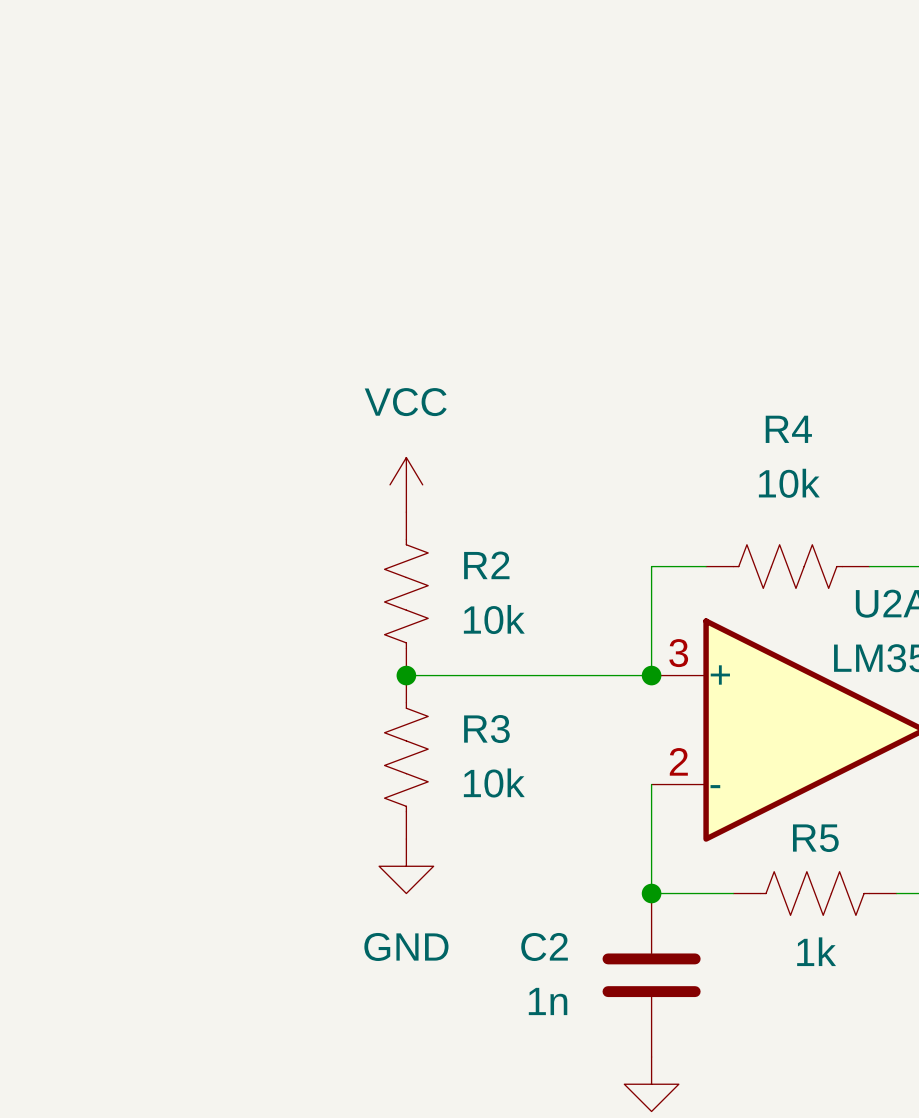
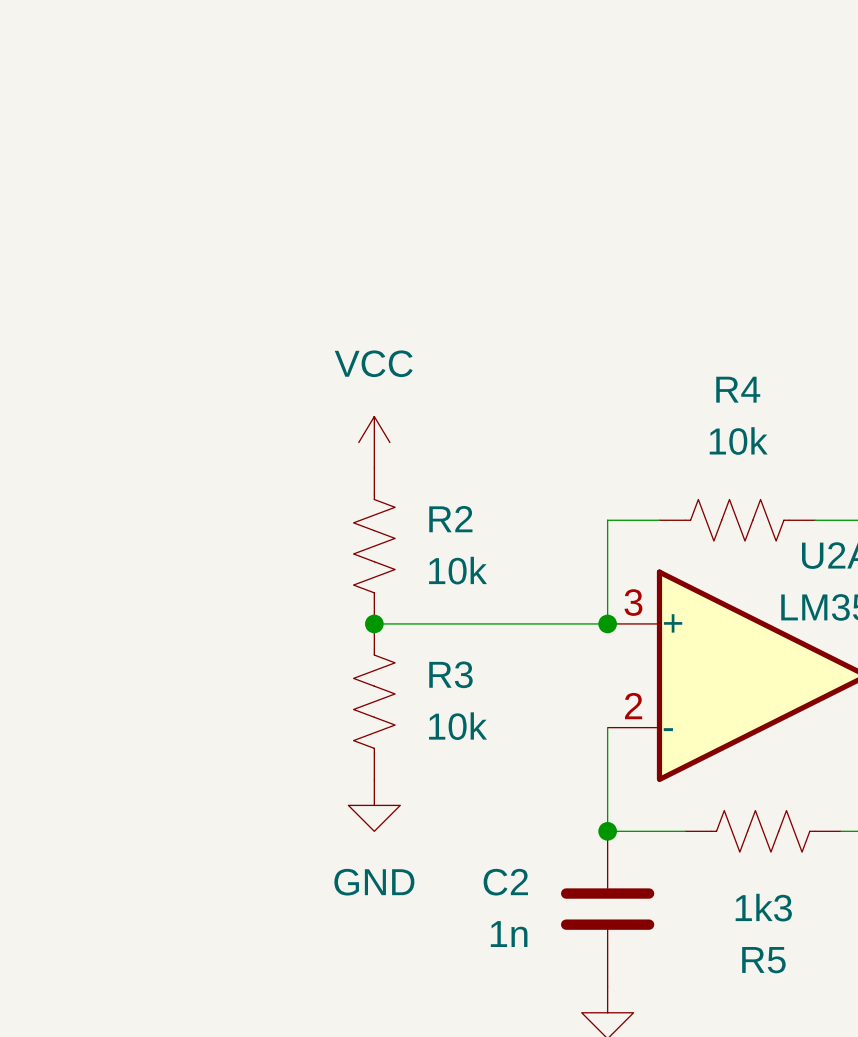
R5 name position: R5 (815, 838) -> R5 (763, 960)
R5 value: 1k (816, 951) -> 1k3 (763, 907)

